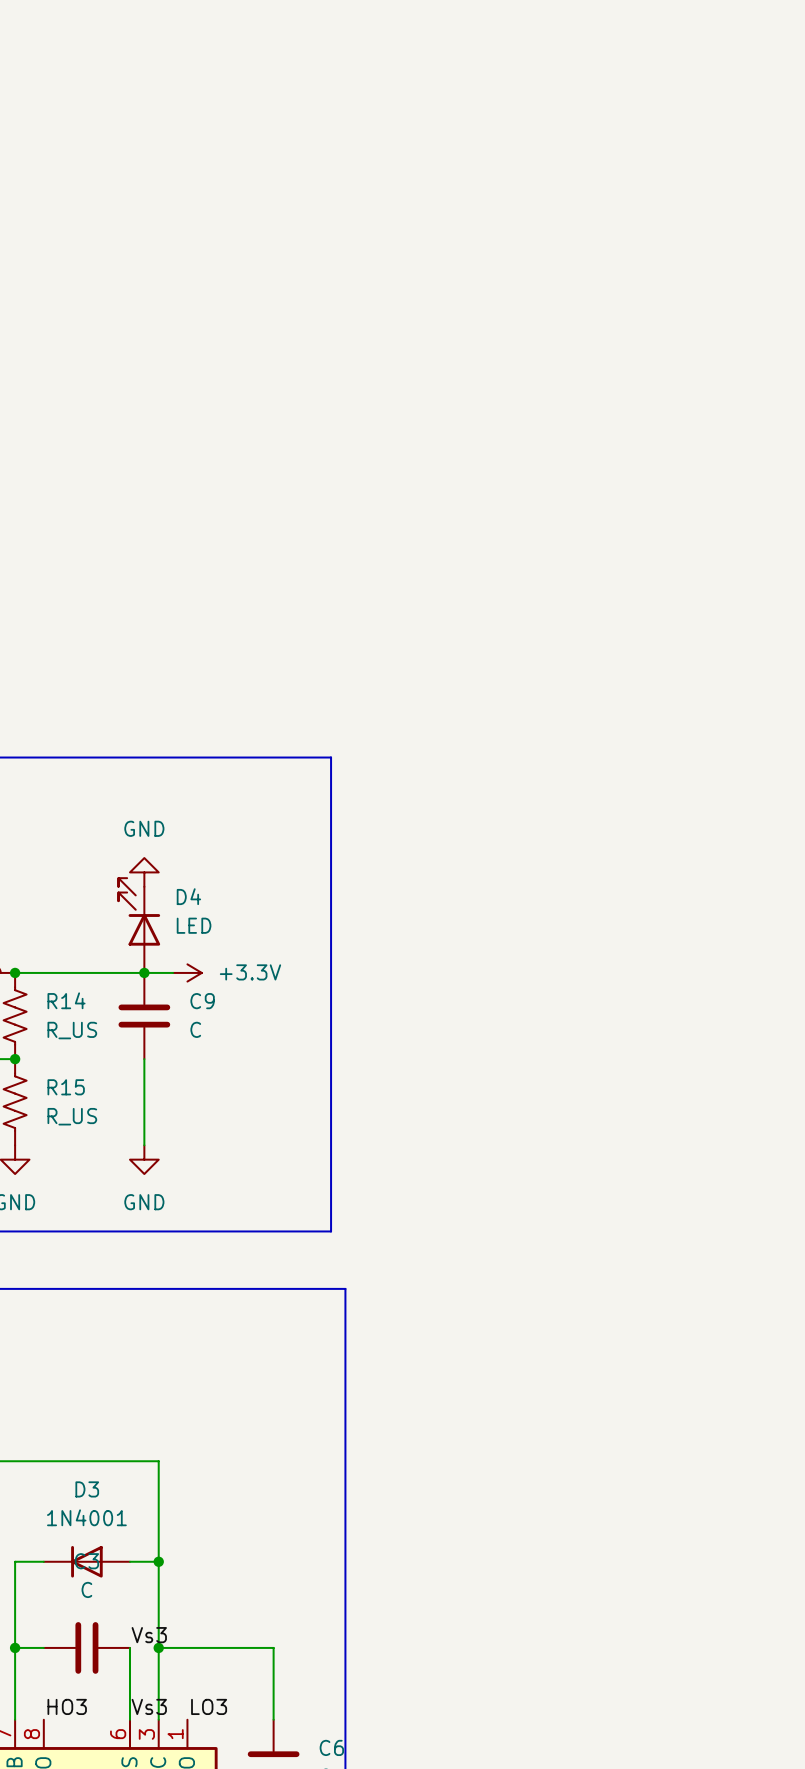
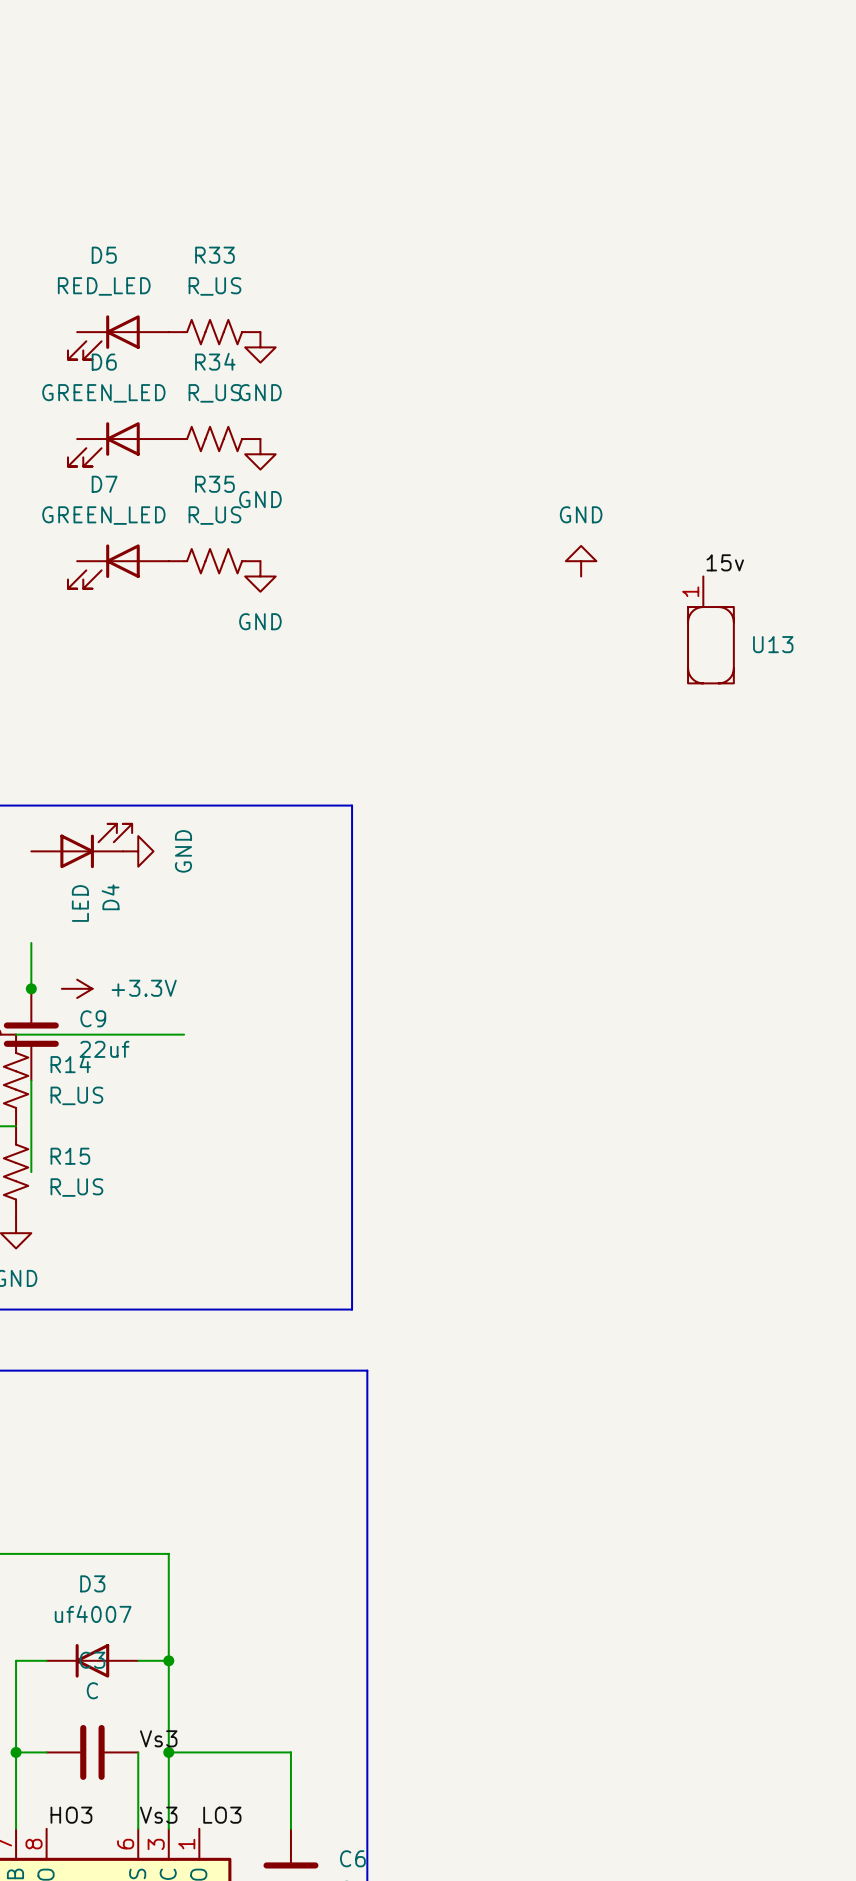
R33: none -> R_US (214, 332)
D5: none -> RED_LED (118, 337)
power symbol: none -> GND (260, 347)
R34: none -> R_US (214, 439)
D6: none -> GREEN_LED (118, 444)
power symbol: none -> GND (260, 454)
R35: none -> R_US (214, 561)
power symbol: none -> GND (581, 561)
label: none -> 15v (725, 562)
D7: none -> GREEN_LED (118, 566)
power symbol: none -> GND (260, 576)
U13: none -> (710, 629)
power symbol rotation: 0° (144, 872) -> 90° clockwise (138, 851)
power symbol position: GND (144, 872) -> GND (138, 851)
wire: none -> (31, 943) (31, 988)
D4 rotation: 0° (139, 911) -> 90° clockwise (96, 846)
D4 position: (139, 925) -> (81, 846)
junction position: (15, 972) -> (31, 988)
junction: (144, 972) -> none
power symbol position: +3.3V (187, 972) -> +3.3V (77, 988)
C9 position: (144, 1016) -> (31, 1034)
C9 value: C (195, 1029) -> 22uf (104, 1049)
junction: (15, 1059) -> none
wire: (144, 1059) (144, 1145) -> (31, 1080) (31, 1172)
power symbol: GND (144, 1159) -> none
D3 value: 1N4001 (86, 1517) -> uf4007 (93, 1614)

